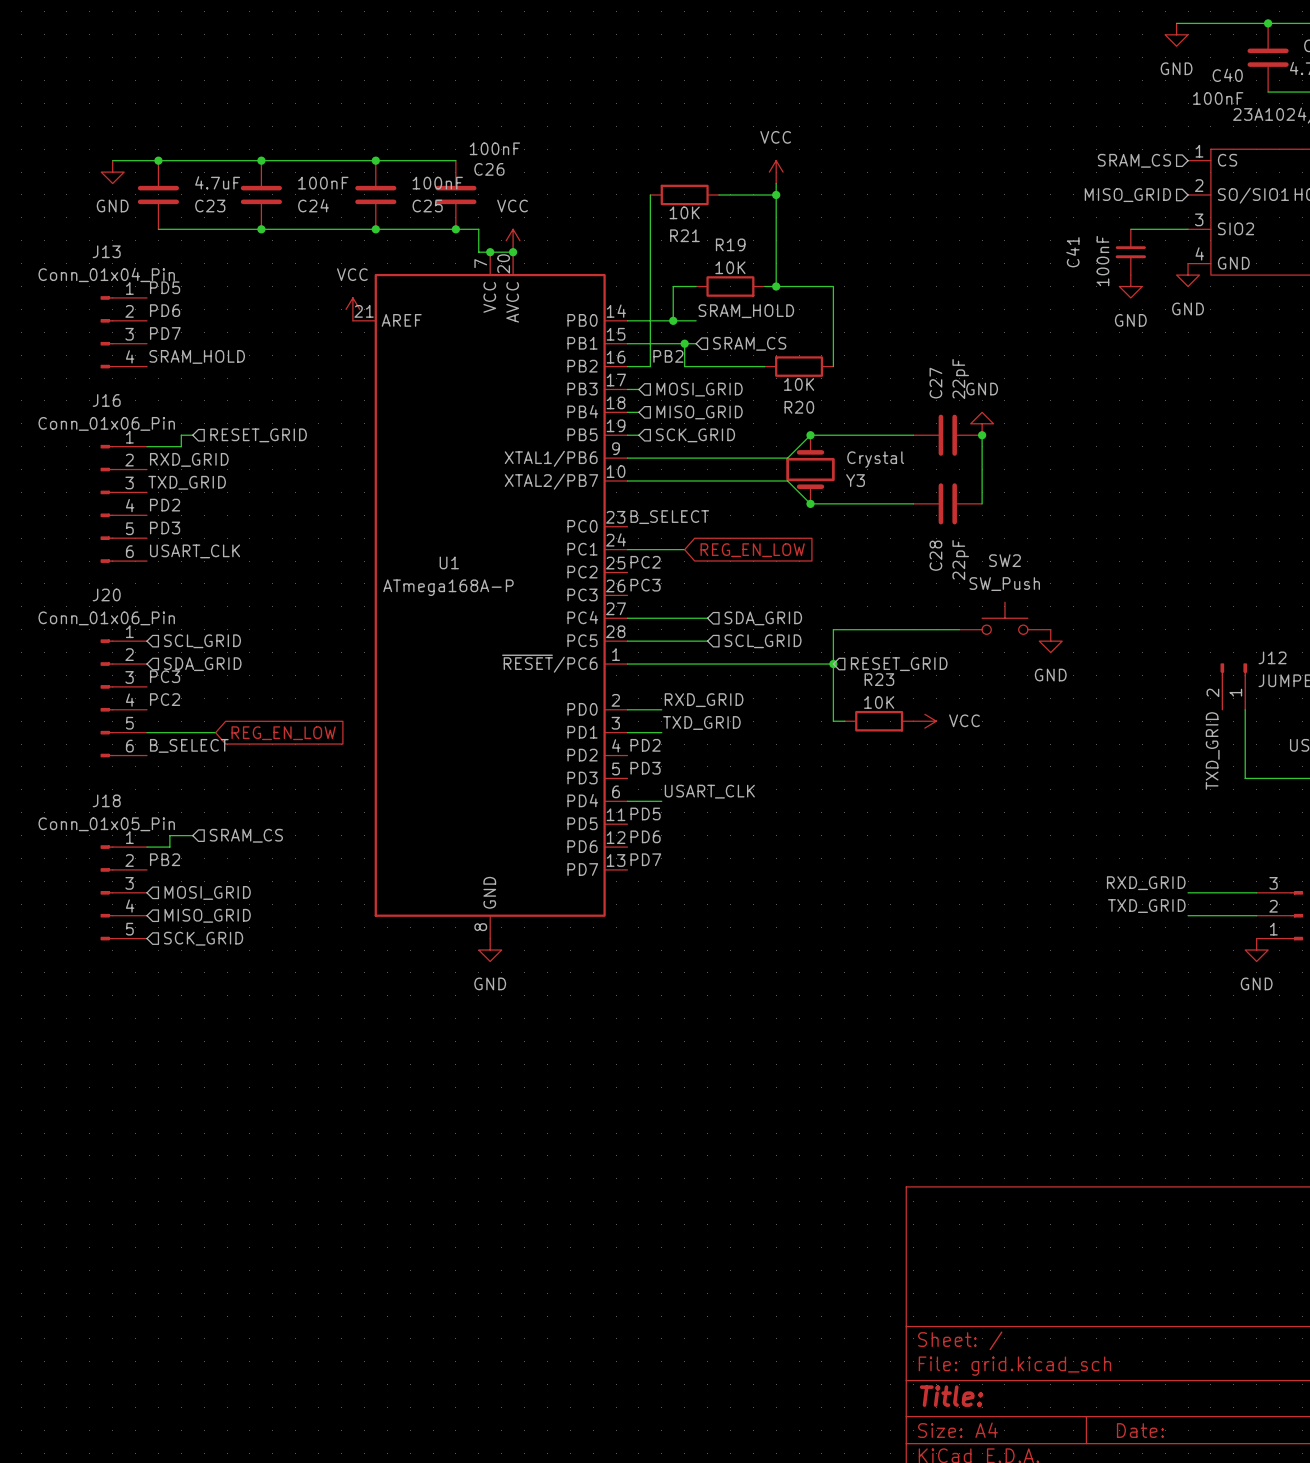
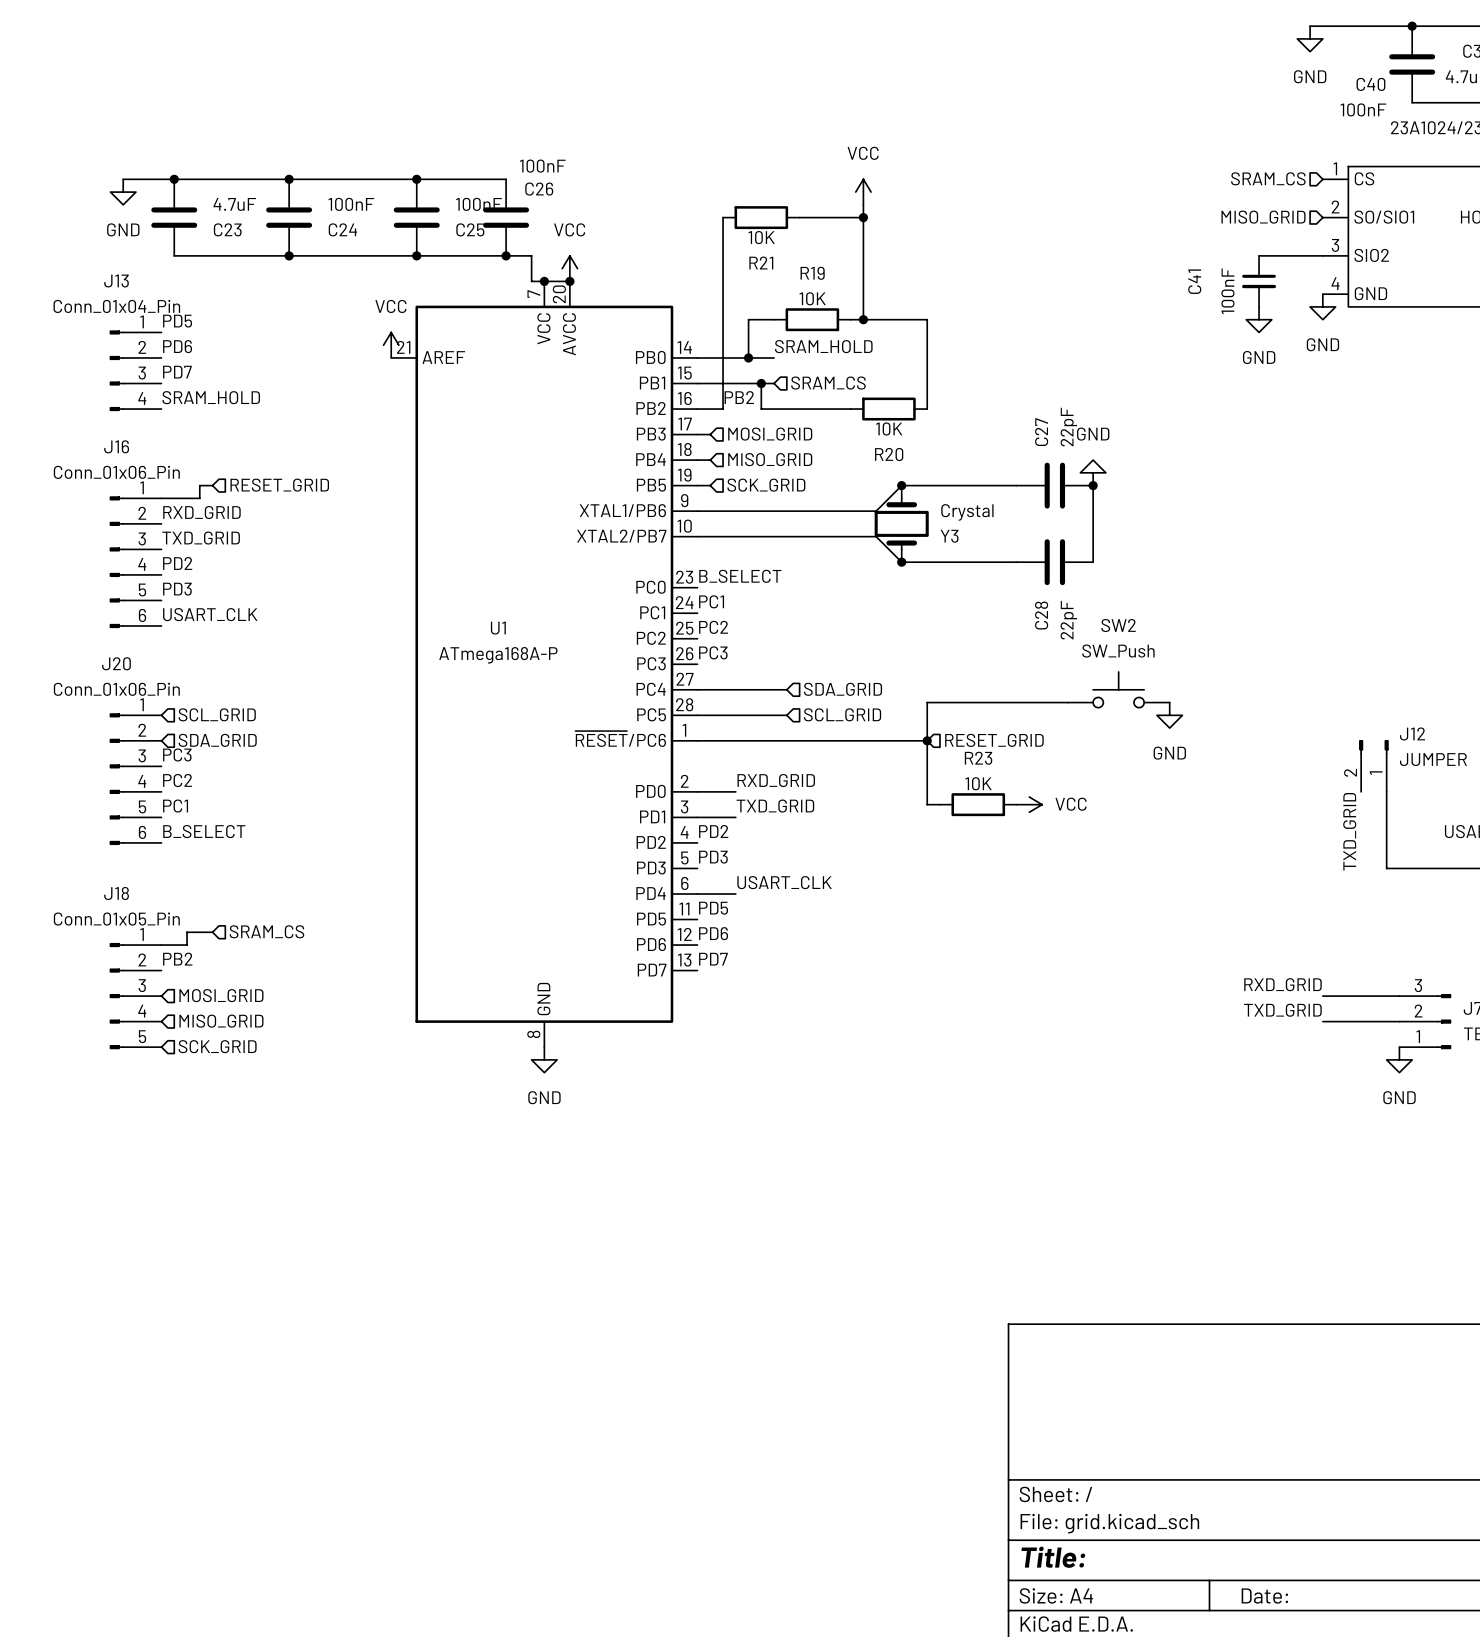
label: none -> PC1 (711, 601)
wire: (627, 549) (684, 549) -> none
global label: REG_EN_LOW (752, 550) -> none
label: none -> PC1 (175, 806)
wire: (147, 732) (215, 732) -> none
global label: REG_EN_LOW (283, 733) -> none

